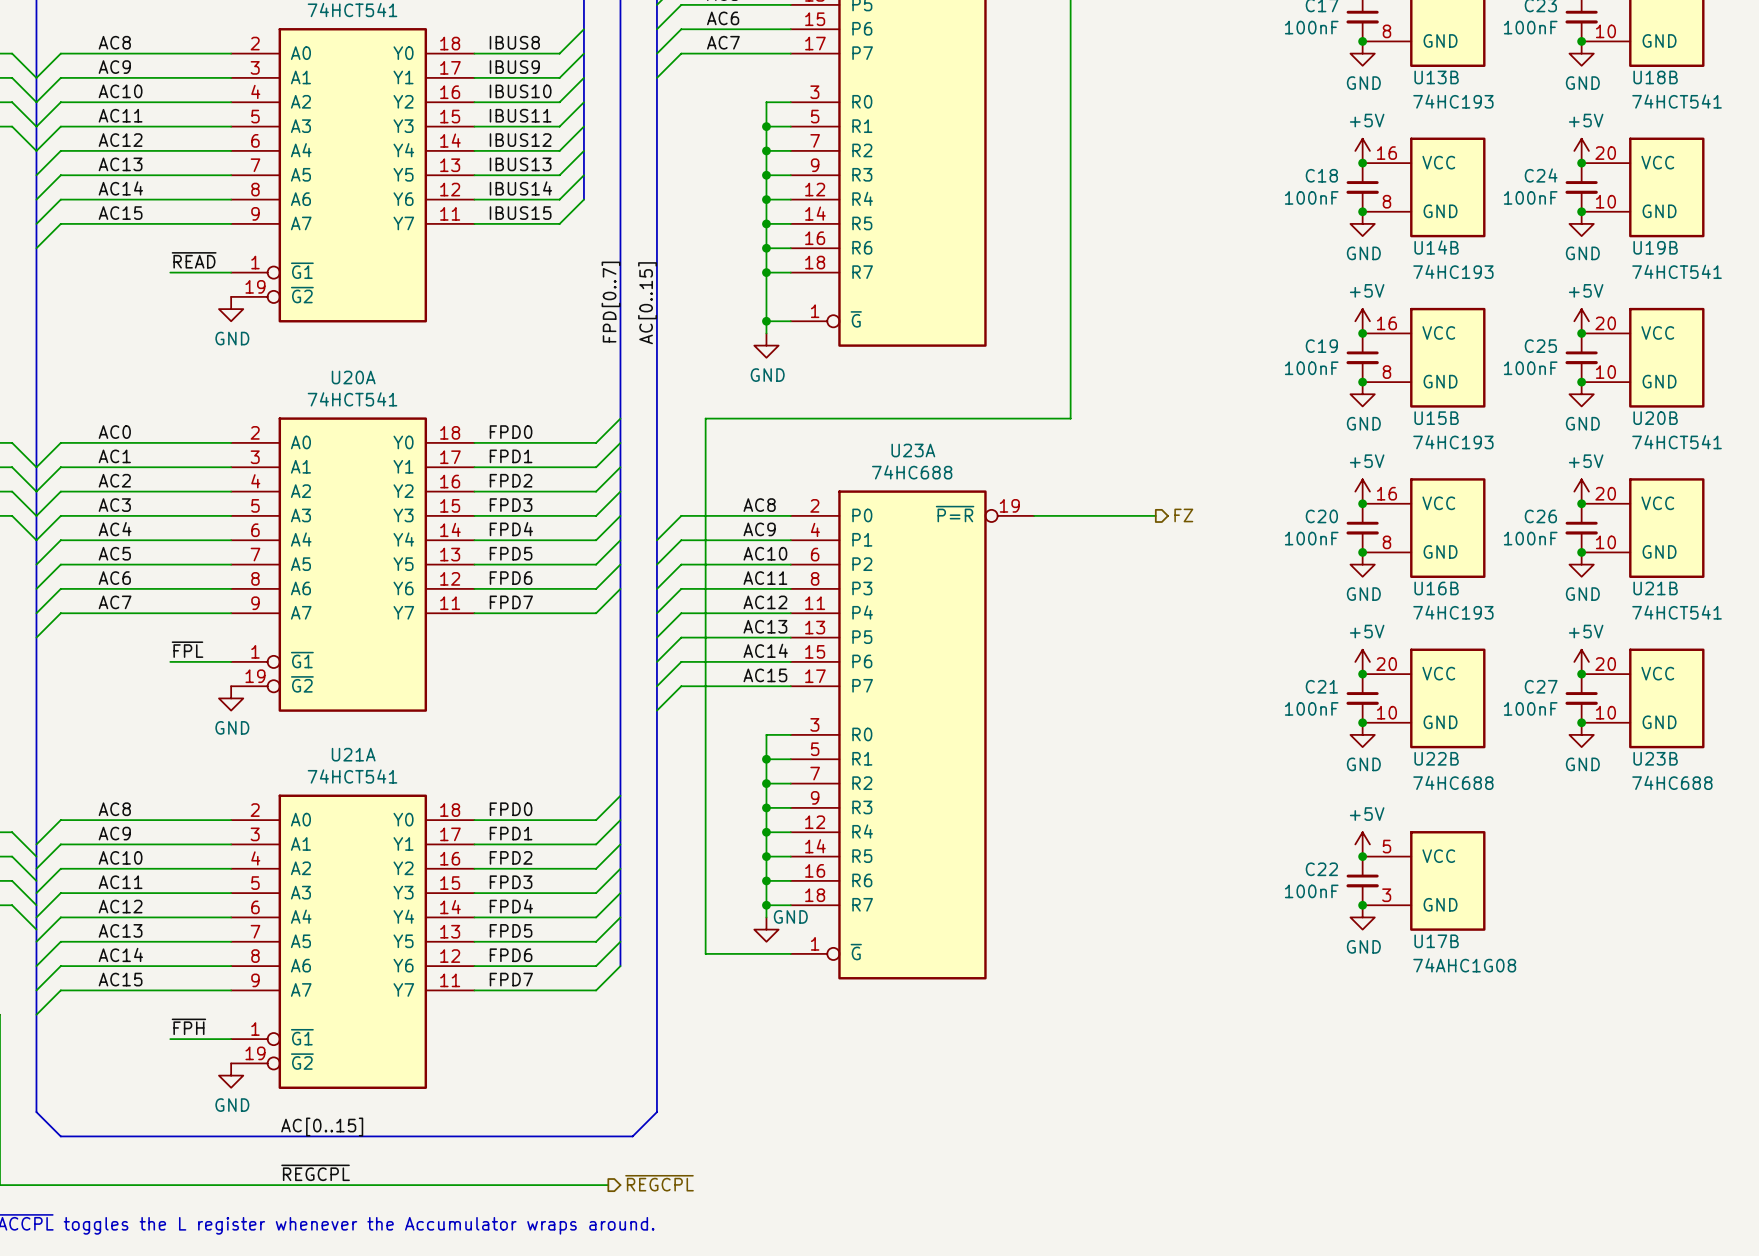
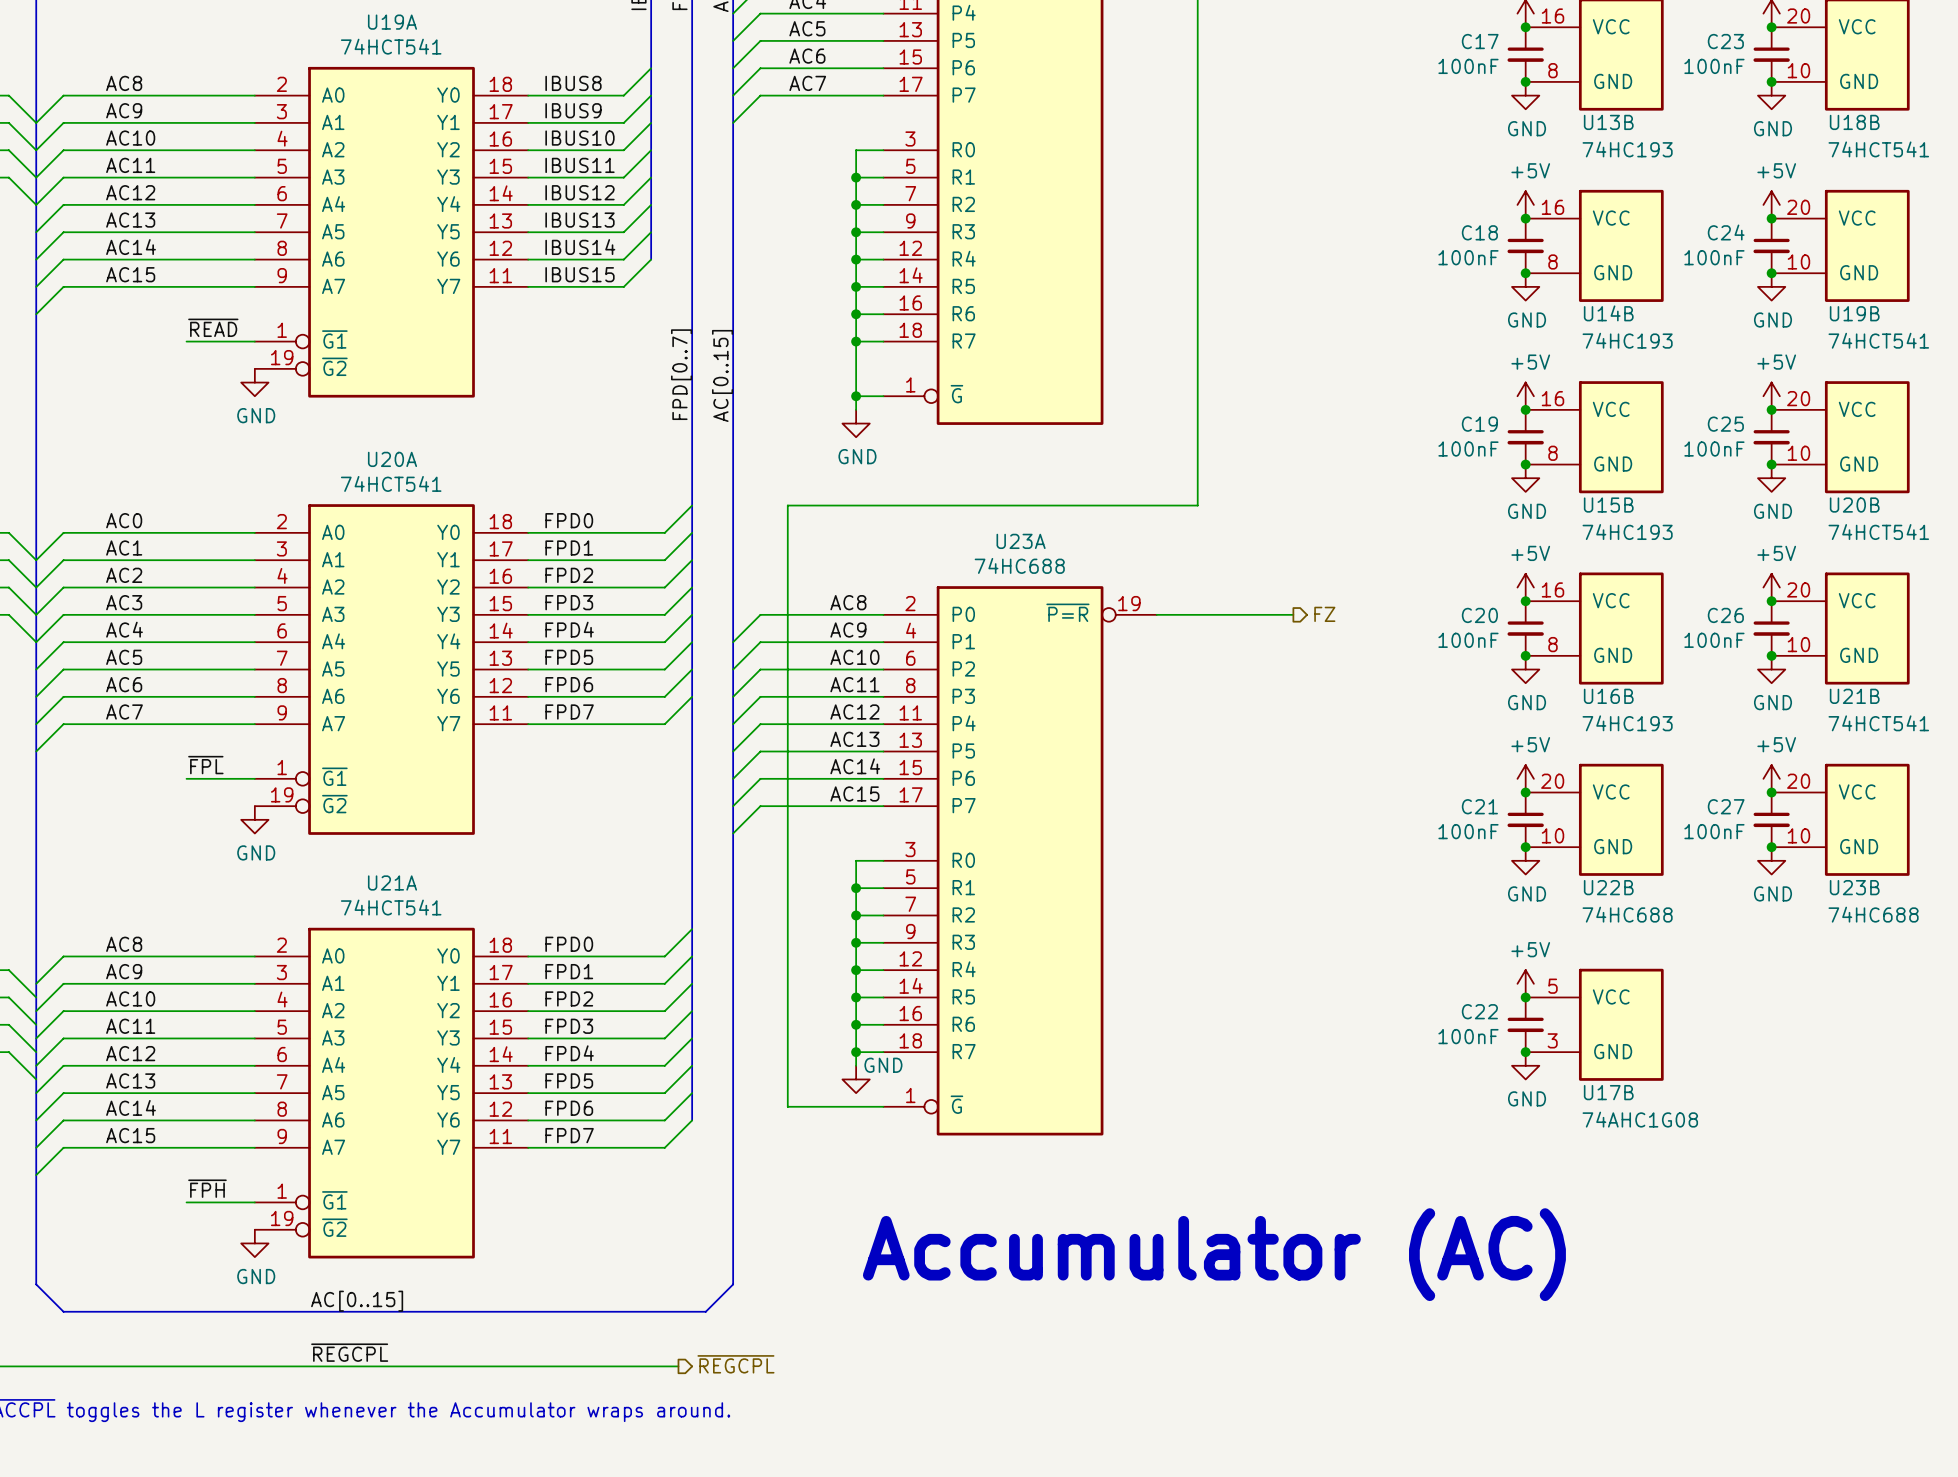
text: none -> Accumulator (AC) (1214, 1254)

